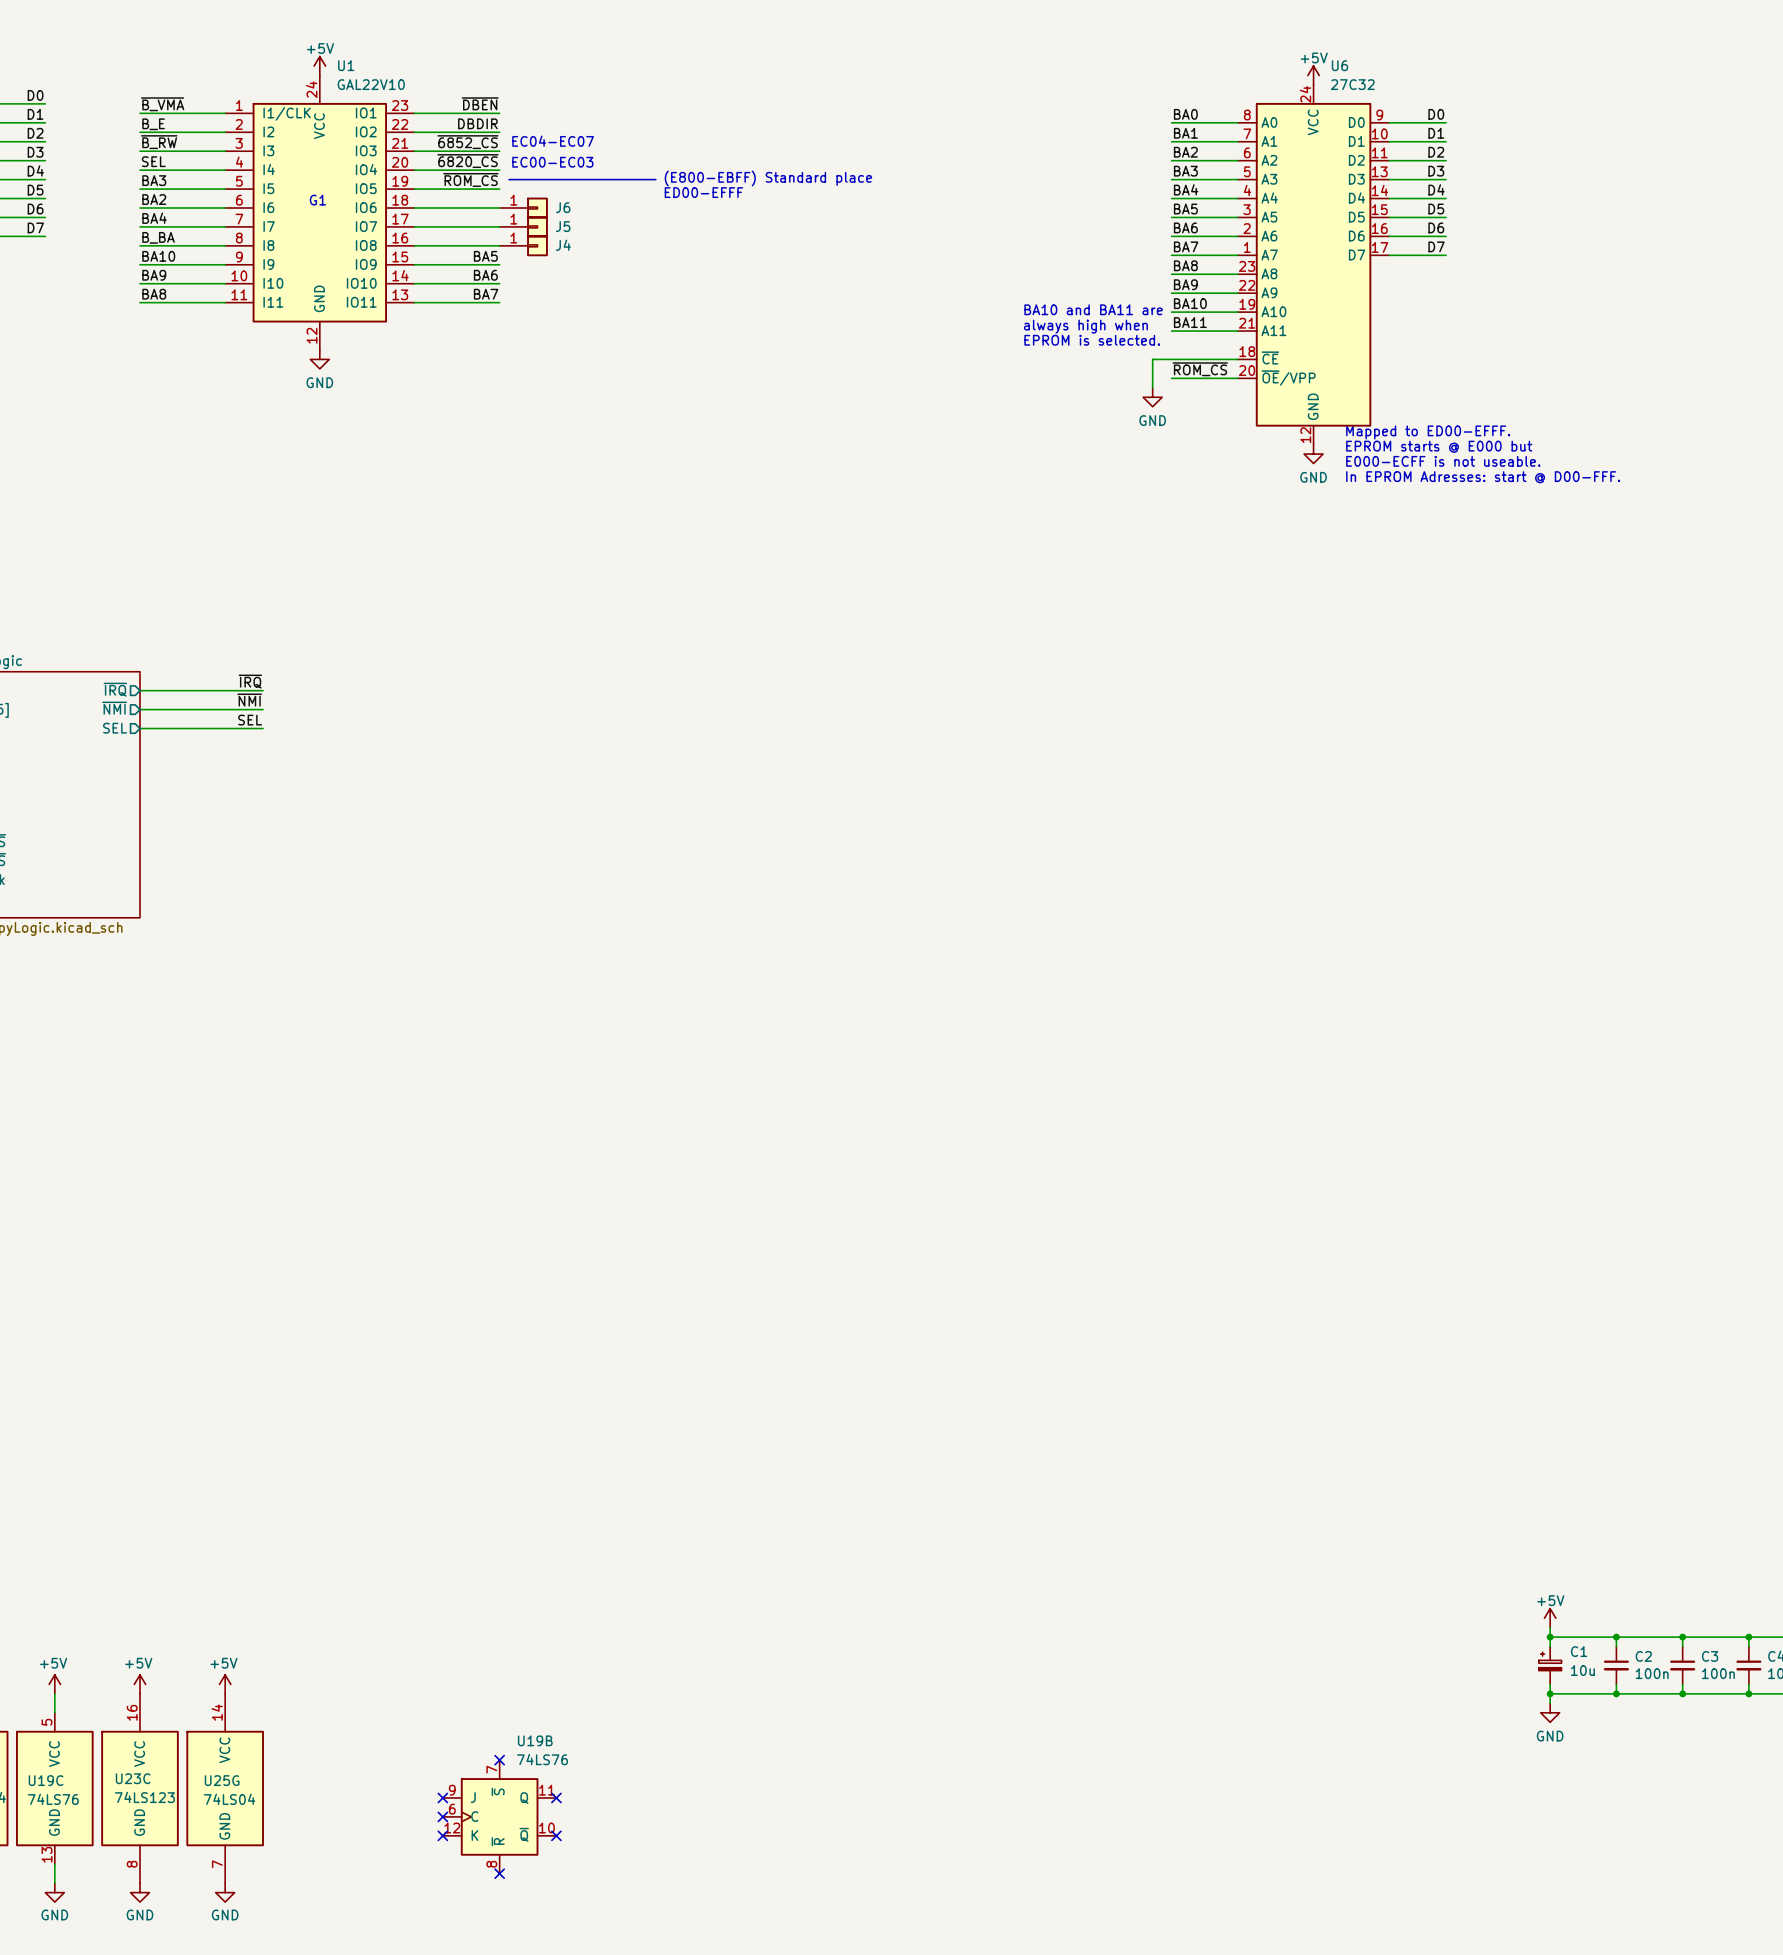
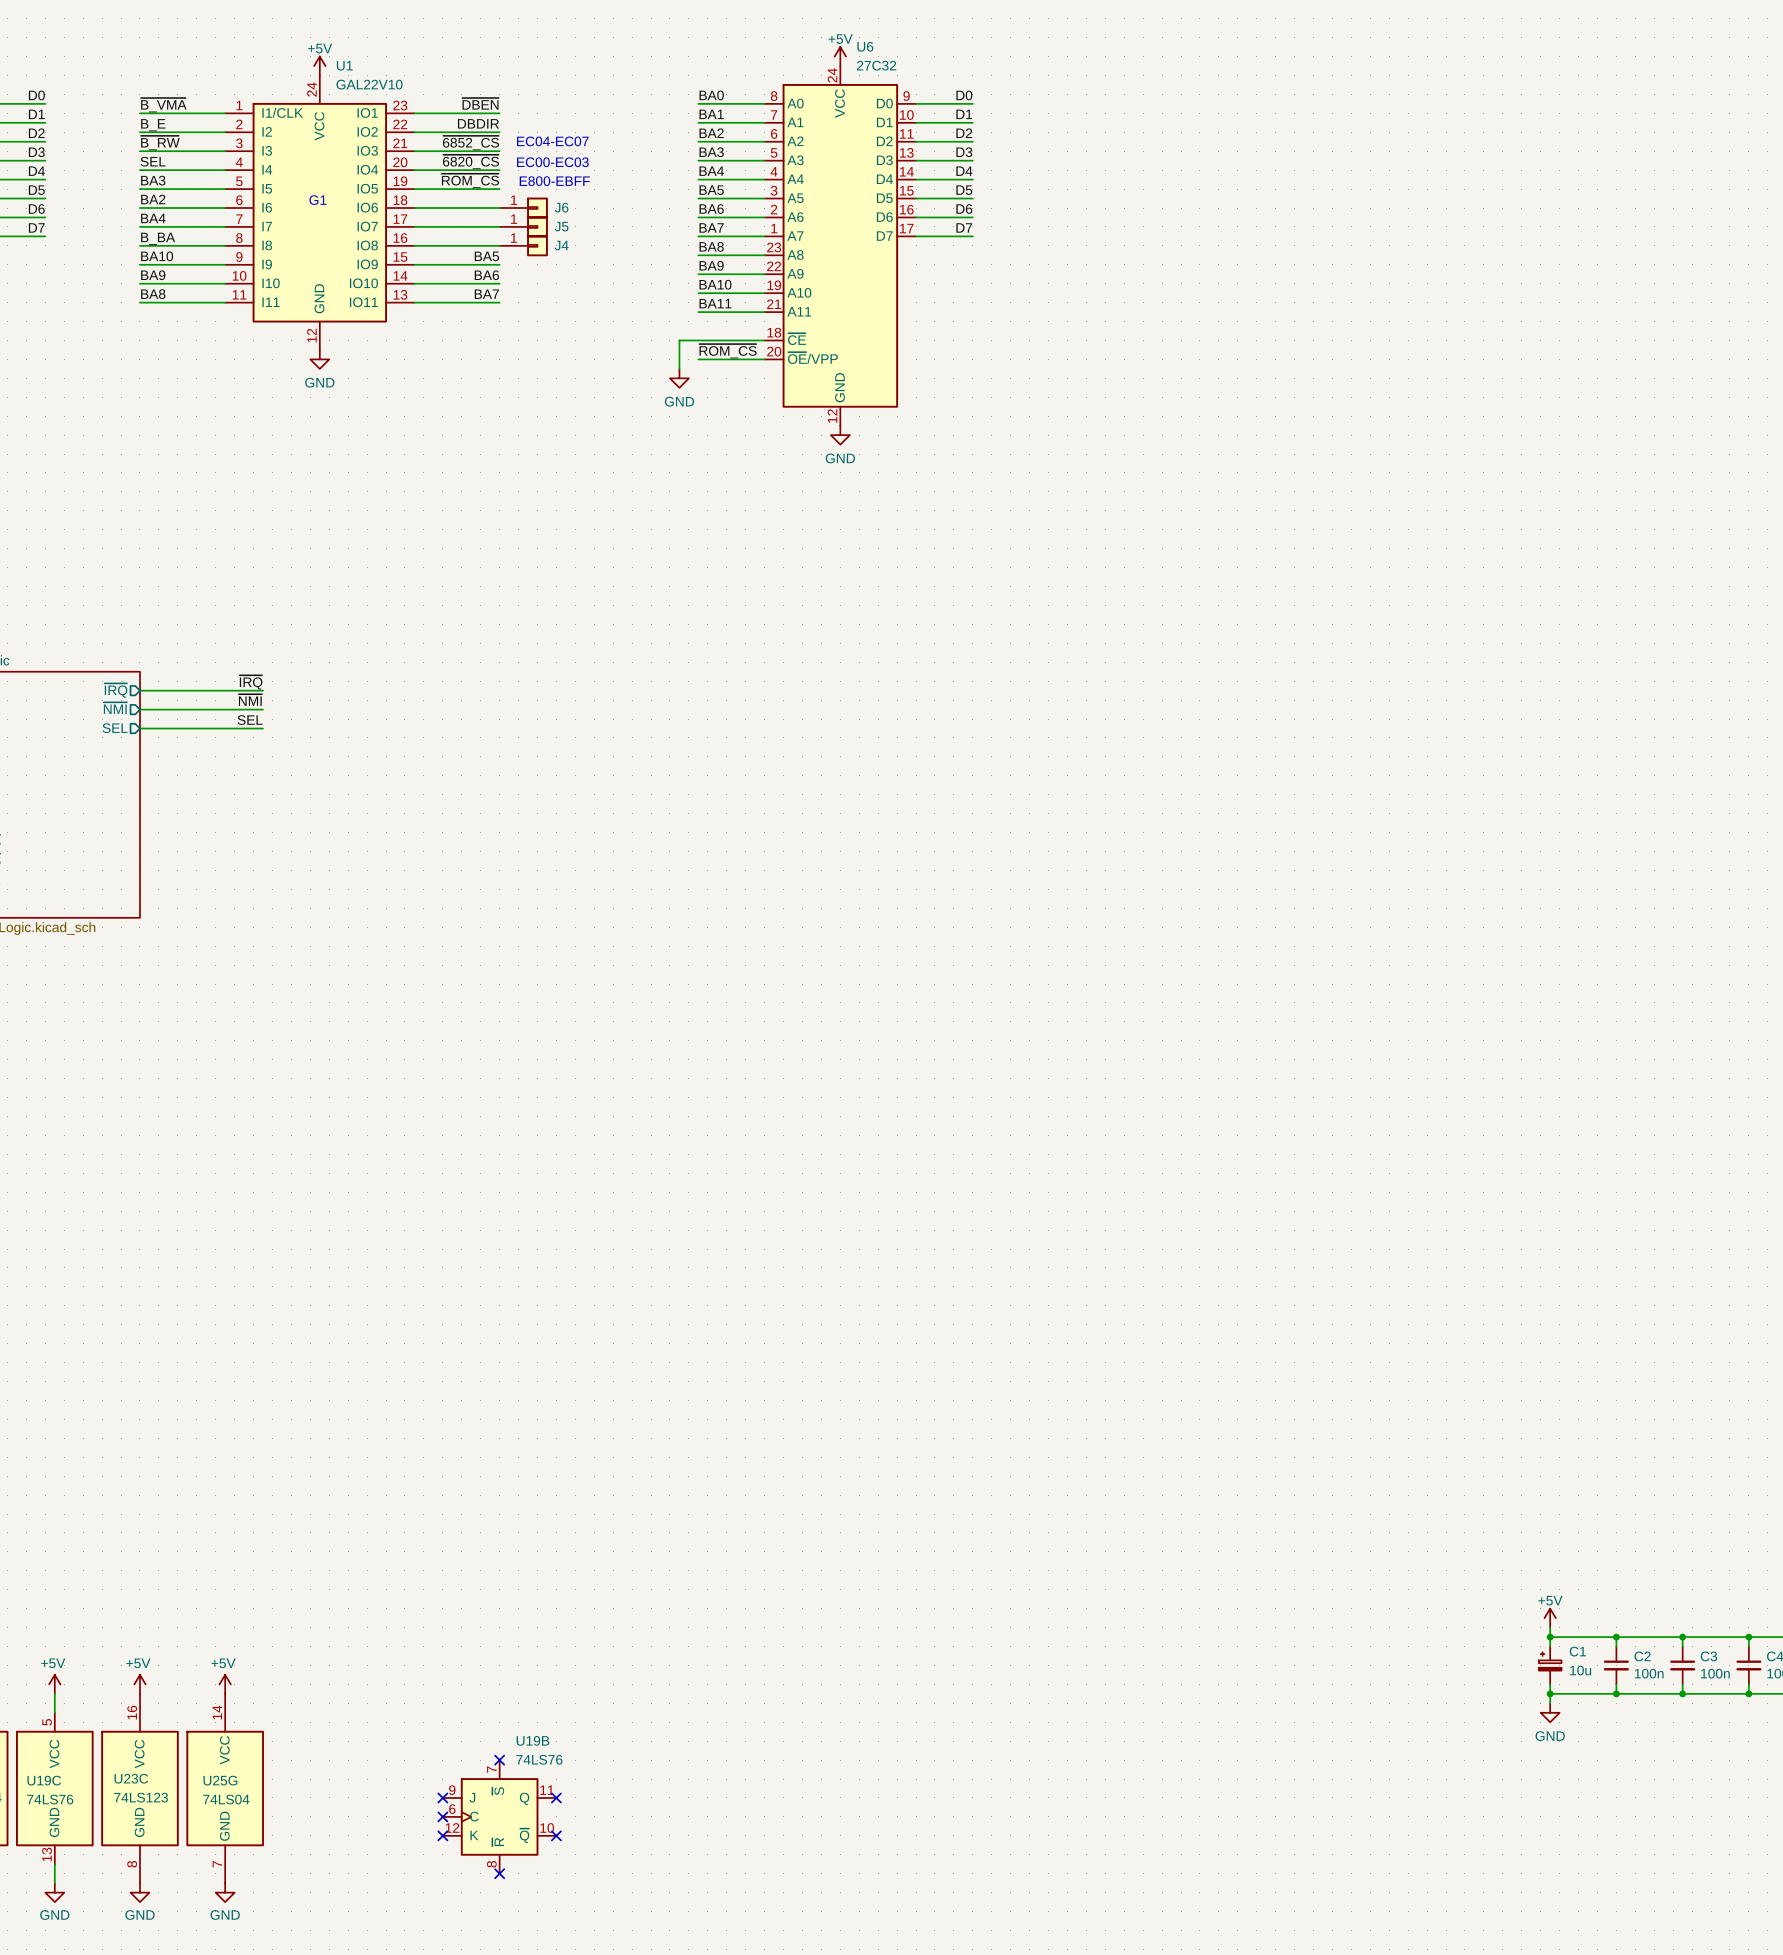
power symbol: none -> +5V (840, 56)
power symbol: +5V (1313, 75) -> none
label: none -> BA0 (711, 95)
label: none -> D0 (964, 95)
wire: none -> (698, 103) (764, 103)
wire: none -> (916, 103) (972, 103)
label: none -> BA1 (711, 114)
label: none -> D1 (964, 114)
label: BA0 (1185, 114) -> none
label: D0 (1436, 114) -> none
wire: none -> (698, 122) (764, 122)
wire: none -> (916, 122) (972, 122)
wire: (1171, 122) (1237, 122) -> none
wire: (1389, 122) (1446, 122) -> none
label: none -> BA2 (711, 133)
label: none -> D2 (964, 133)
label: BA1 (1185, 133) -> none
label: D1 (1436, 133) -> none
wire: none -> (698, 141) (764, 141)
wire: none -> (916, 141) (972, 141)
wire: (1171, 141) (1237, 141) -> none
wire: (1389, 141) (1446, 141) -> none
label: none -> BA3 (711, 152)
label: none -> D3 (964, 152)
label: BA2 (1185, 152) -> none
label: D2 (1436, 152) -> none
wire: none -> (698, 160) (764, 160)
wire: none -> (916, 160) (972, 160)
wire: (1171, 160) (1237, 160) -> none
wire: (1389, 160) (1446, 160) -> none
label: none -> BA4 (711, 171)
label: none -> D4 (964, 171)
label: BA3 (1185, 171) -> none
label: D3 (1436, 171) -> none
text: (E800-EBFF) Standard place (768, 178) -> none
line: (509, 179) (655, 179) -> none
wire: none -> (698, 179) (764, 179)
wire: none -> (916, 179) (972, 179)
wire: (1171, 179) (1237, 179) -> none
wire: (1389, 179) (1446, 179) -> none
text: none -> E800-EBFF (554, 181)
label: BA4 (1186, 189) -> none
label: D4 (1436, 189) -> none
label: none -> BA5 (711, 190)
label: none -> D5 (964, 190)
text: ED00-EFFF (703, 192) -> none
wire: none -> (698, 198) (764, 198)
wire: none -> (916, 198) (972, 198)
wire: (1171, 198) (1237, 198) -> none
wire: (1389, 198) (1446, 198) -> none
label: none -> BA6 (711, 209)
label: none -> D6 (964, 209)
label: BA5 (1185, 209) -> none
label: D5 (1436, 209) -> none
wire: none -> (698, 217) (764, 217)
wire: none -> (916, 217) (972, 217)
wire: (1171, 217) (1237, 217) -> none
wire: (1389, 217) (1446, 217) -> none
label: none -> BA7 (711, 227)
label: none -> D7 (964, 227)
label: BA6 (1185, 227) -> none
label: D6 (1436, 227) -> none
wire: none -> (698, 236) (764, 236)
wire: none -> (916, 236) (972, 236)
wire: (1171, 236) (1237, 236) -> none
wire: (1389, 236) (1446, 236) -> none
label: none -> BA8 (711, 246)
label: BA7 (1186, 246) -> none
label: D7 (1436, 246) -> none
wire: none -> (698, 255) (764, 255)
wire: (1171, 255) (1237, 255) -> none
wire: (1389, 255) (1446, 255) -> none
U6 position: (1313, 264) -> (840, 245)
label: none -> BA9 (711, 265)
label: BA8 (1185, 265) -> none
wire: none -> (698, 274) (764, 274)
wire: (1171, 274) (1237, 274) -> none
label: none -> BA10 (715, 284)
label: BA9 (1185, 284) -> none
wire: none -> (698, 293) (764, 293)
wire: (1171, 293) (1237, 293) -> none
label: none -> BA11 (715, 303)
label: BA10 (1190, 303) -> none
text: BA10 and BA11 are (1093, 309) -> none
wire: none -> (698, 312) (764, 312)
wire: (1171, 312) (1237, 312) -> none
label: BA11 (1190, 322) -> none
text: always high when (1085, 326) -> none
wire: (1171, 331) (1237, 331) -> none
wire: none -> (764, 340) (679, 340) (679, 368)
text: EPROM is selected. (1092, 340) -> none
label: none -> ~{ROM_CS} (727, 351)
wire: none -> (698, 359) (764, 359)
wire: (1237, 359) (1152, 359) (1152, 387) -> none
label: ~{ROM_CS} (1200, 369) -> none
power symbol: none -> GND (679, 378)
wire: (1171, 378) (1237, 378) -> none
power symbol: GND (1152, 397) -> none
text: Mapped to ED00-EFFF. (1428, 432) -> none
power symbol: none -> GND (840, 435)
text: EPROM starts @ E000 but (1439, 446) -> none
power symbol: GND (1313, 454) -> none
text: E000-ECFF is not useable. (1443, 461) -> none
text: In EPROM Adresses: start @ D00-FFF. (1483, 477) -> none

